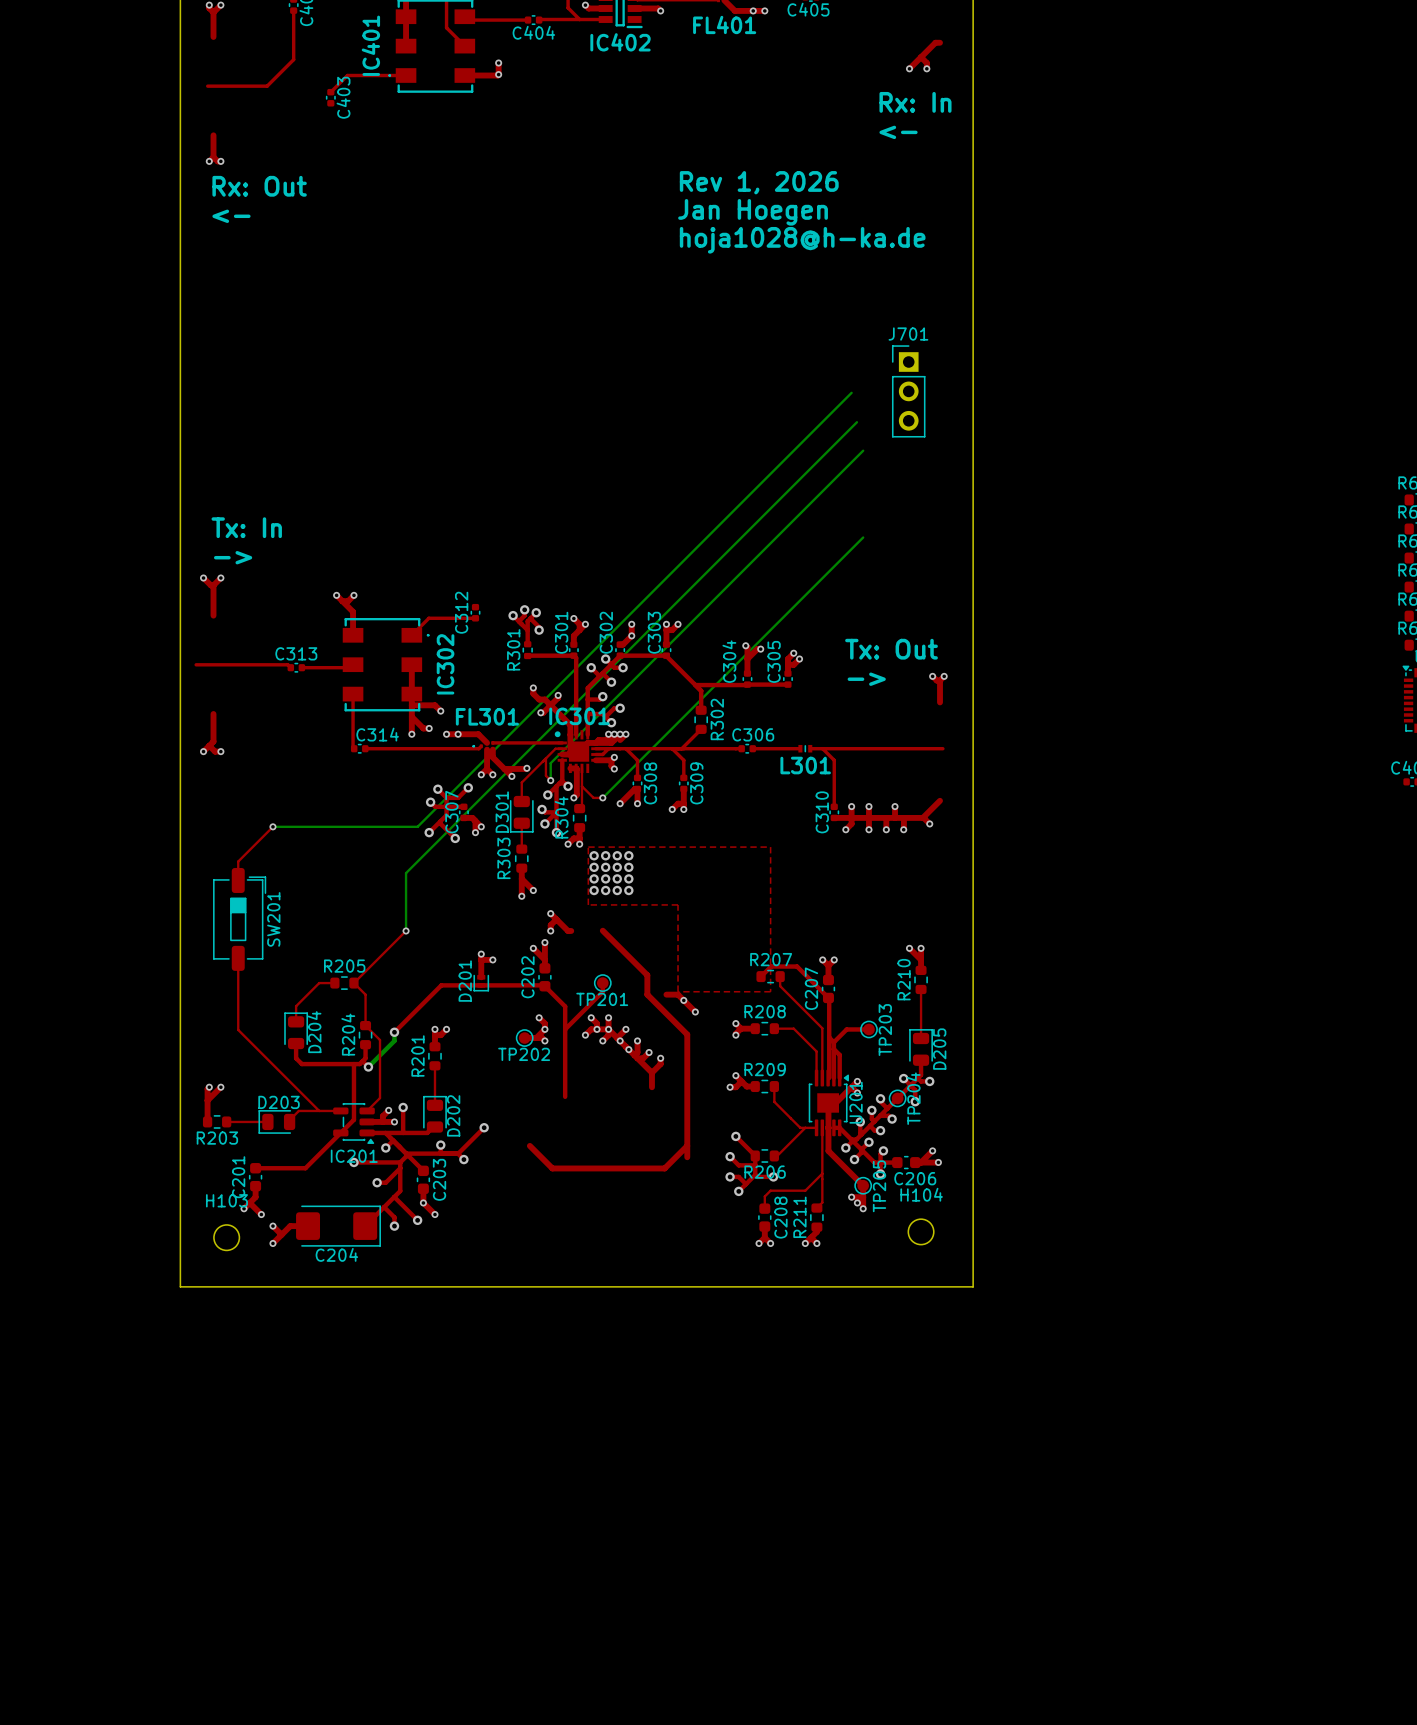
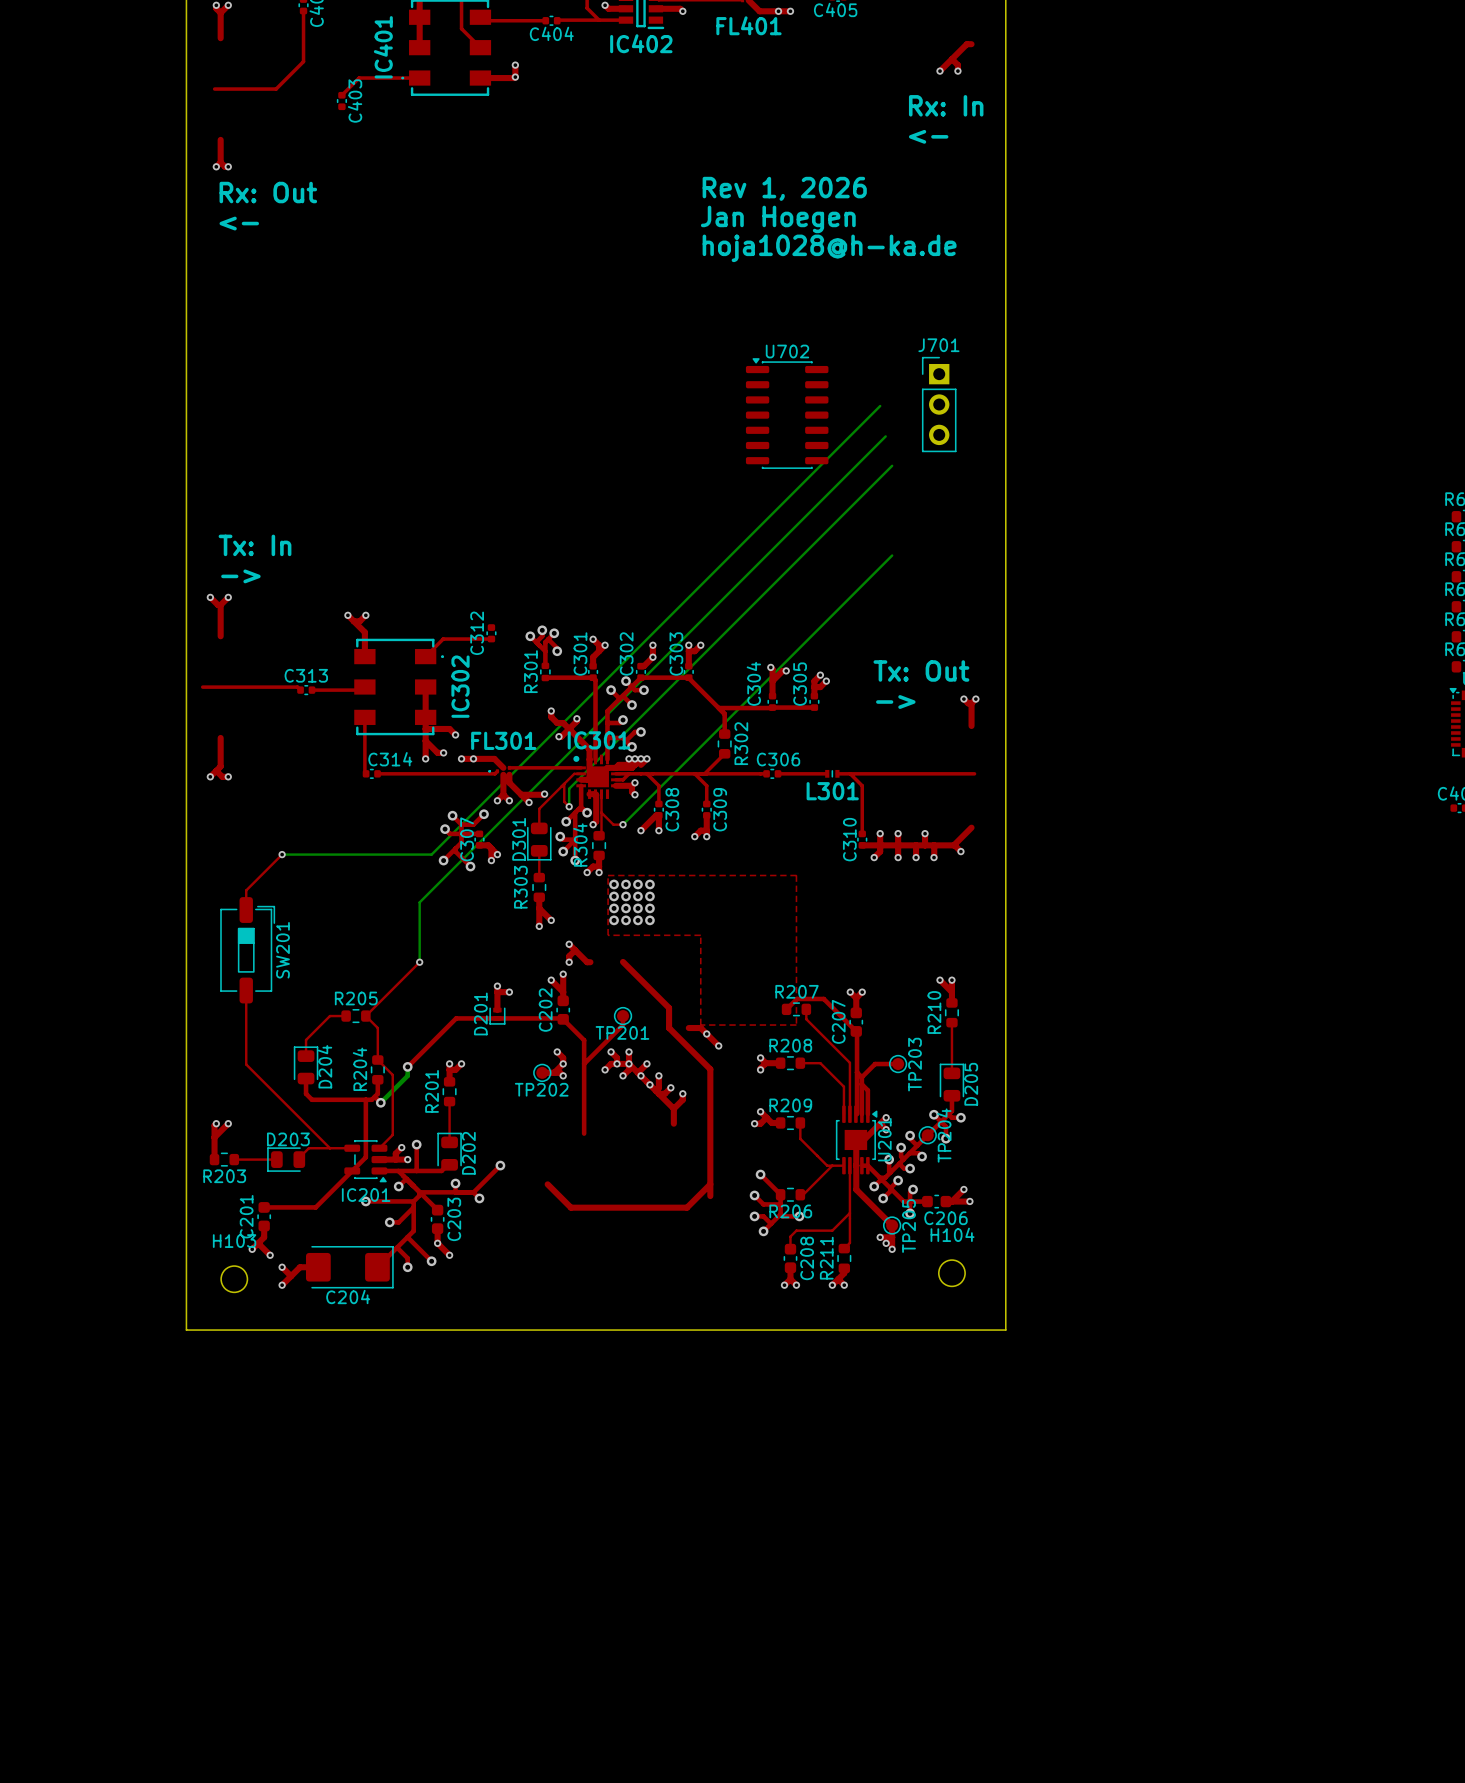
U702: none -> (787, 413)

